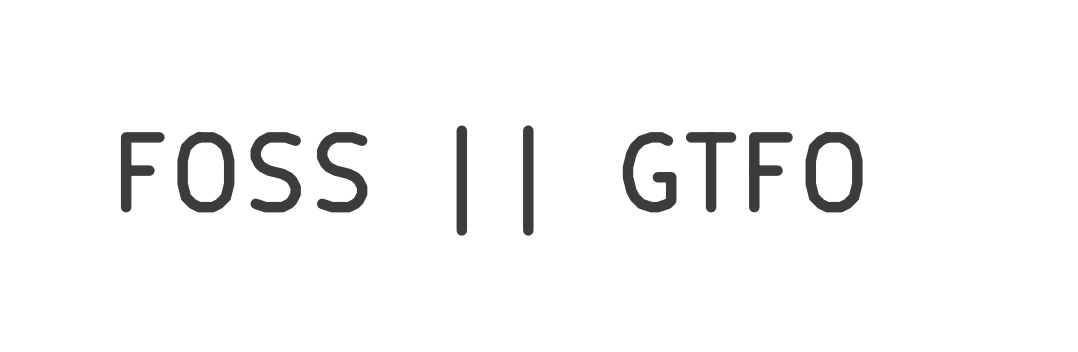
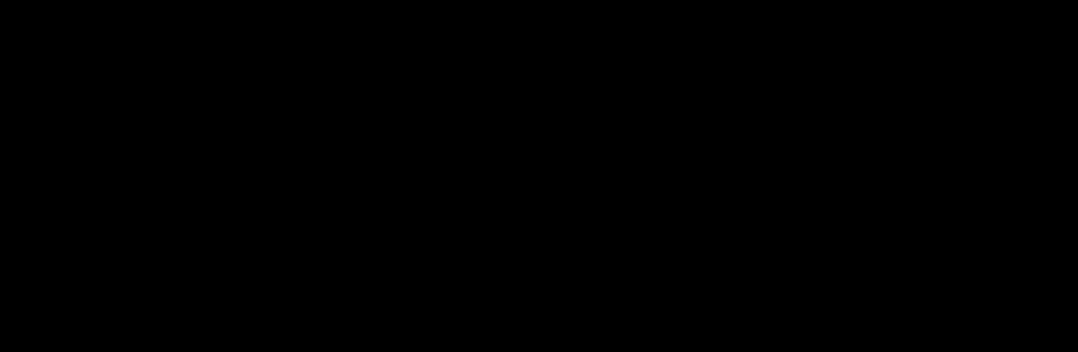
text: FOSS || GTFO (491, 180) -> none

